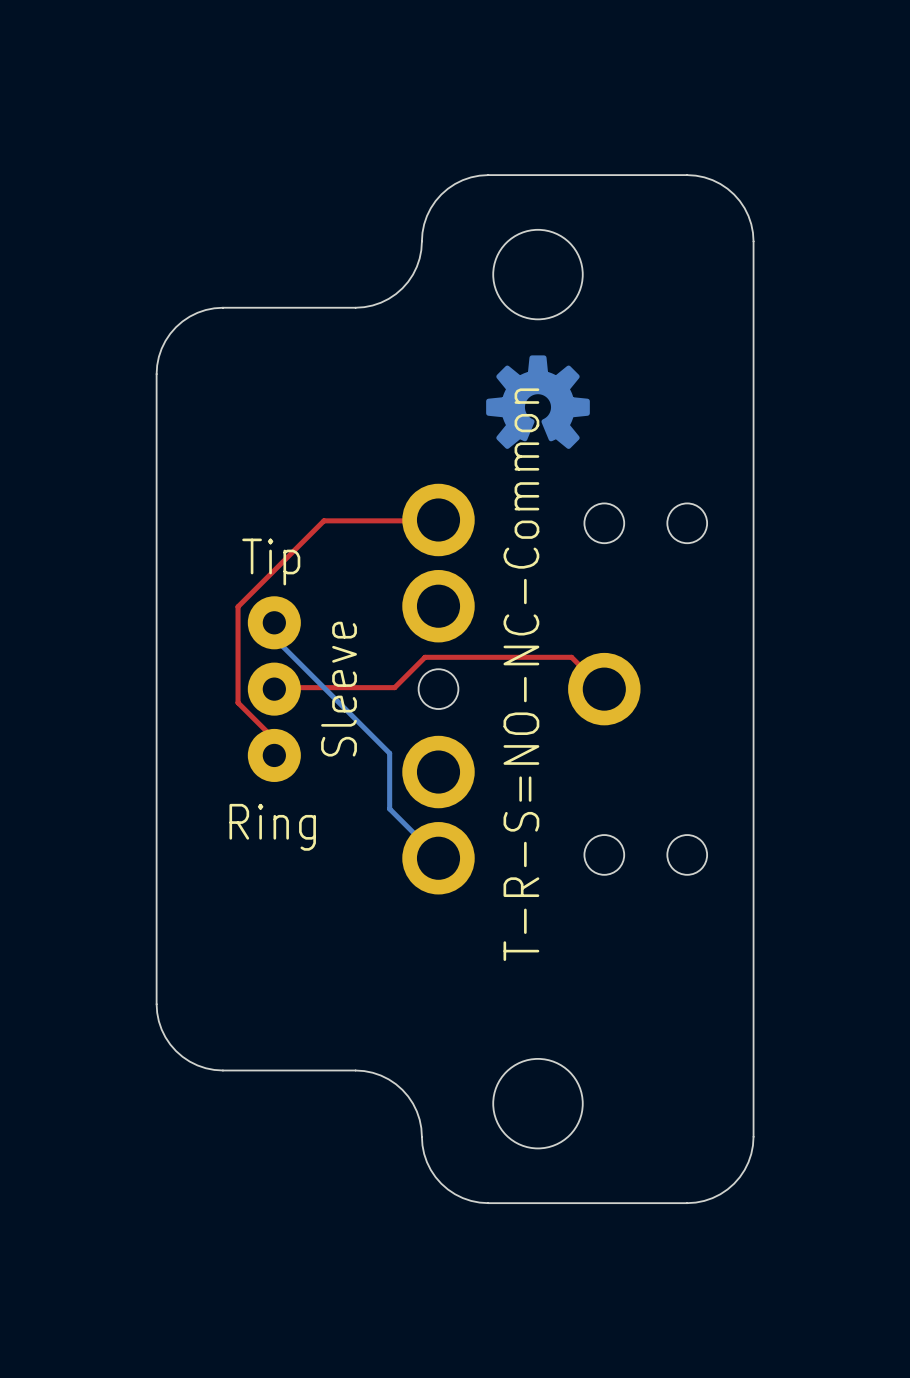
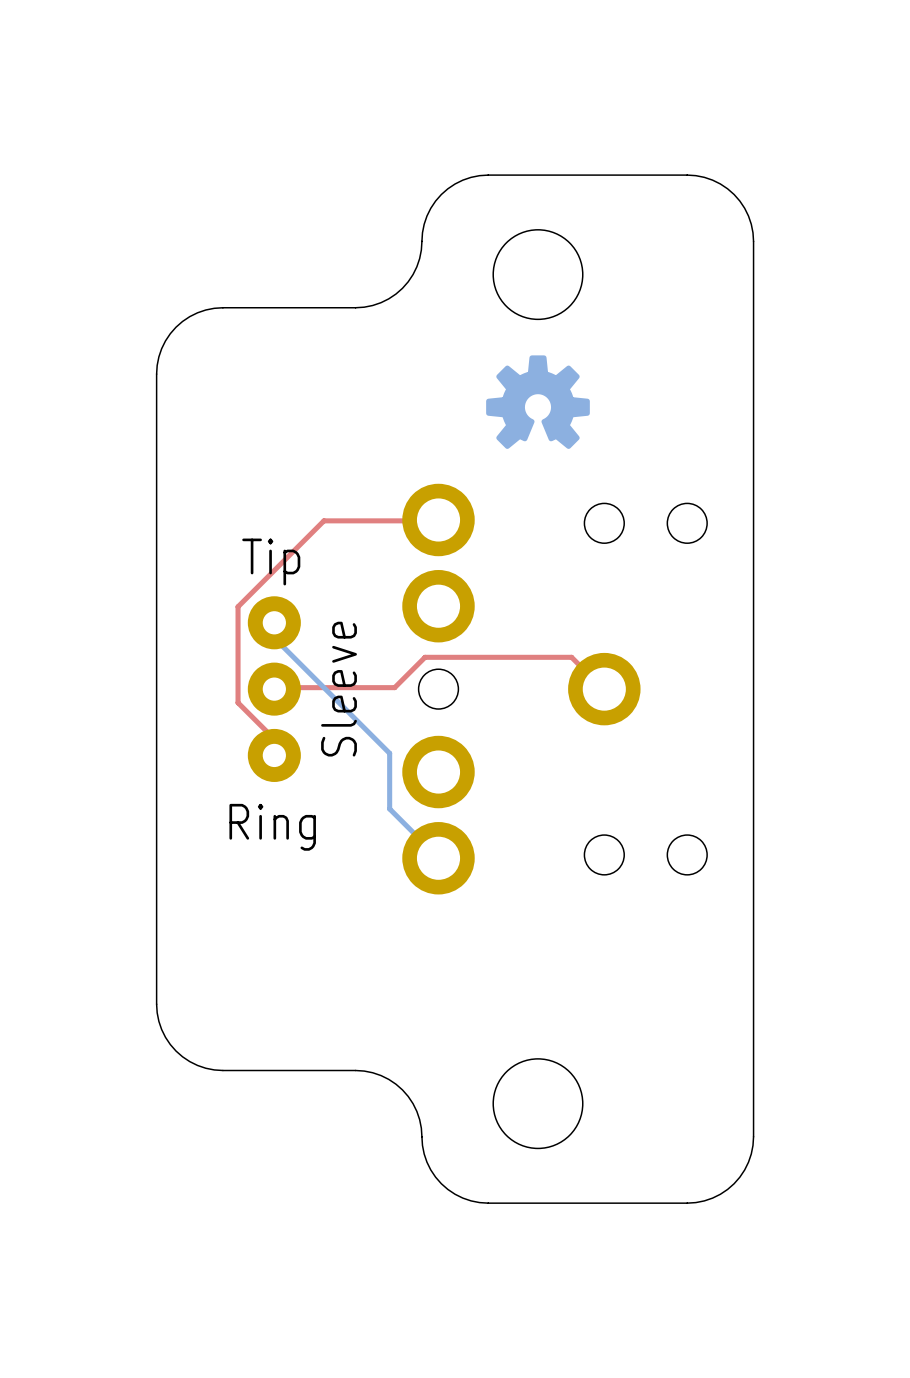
text: T-R-S=NO-NC-Common (521, 674) -> none

